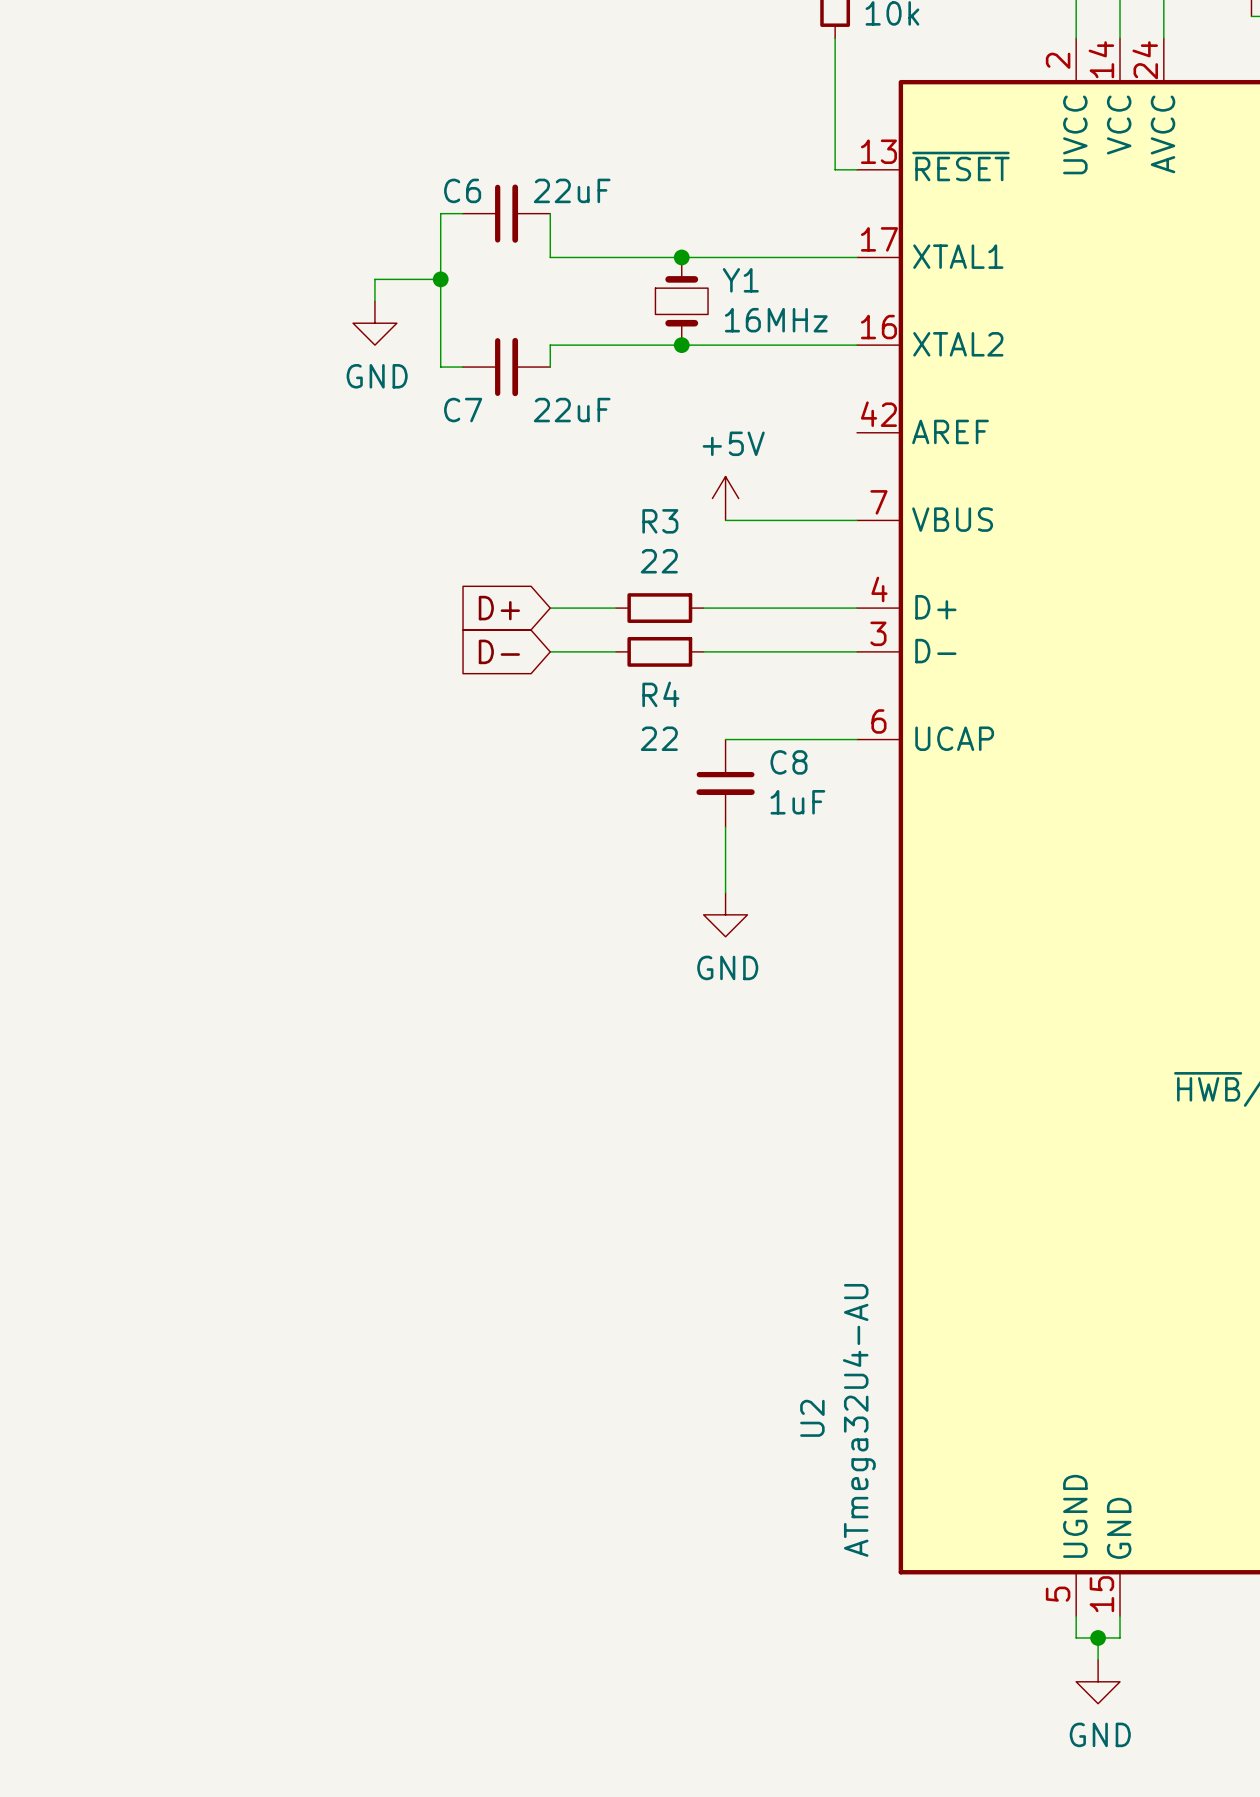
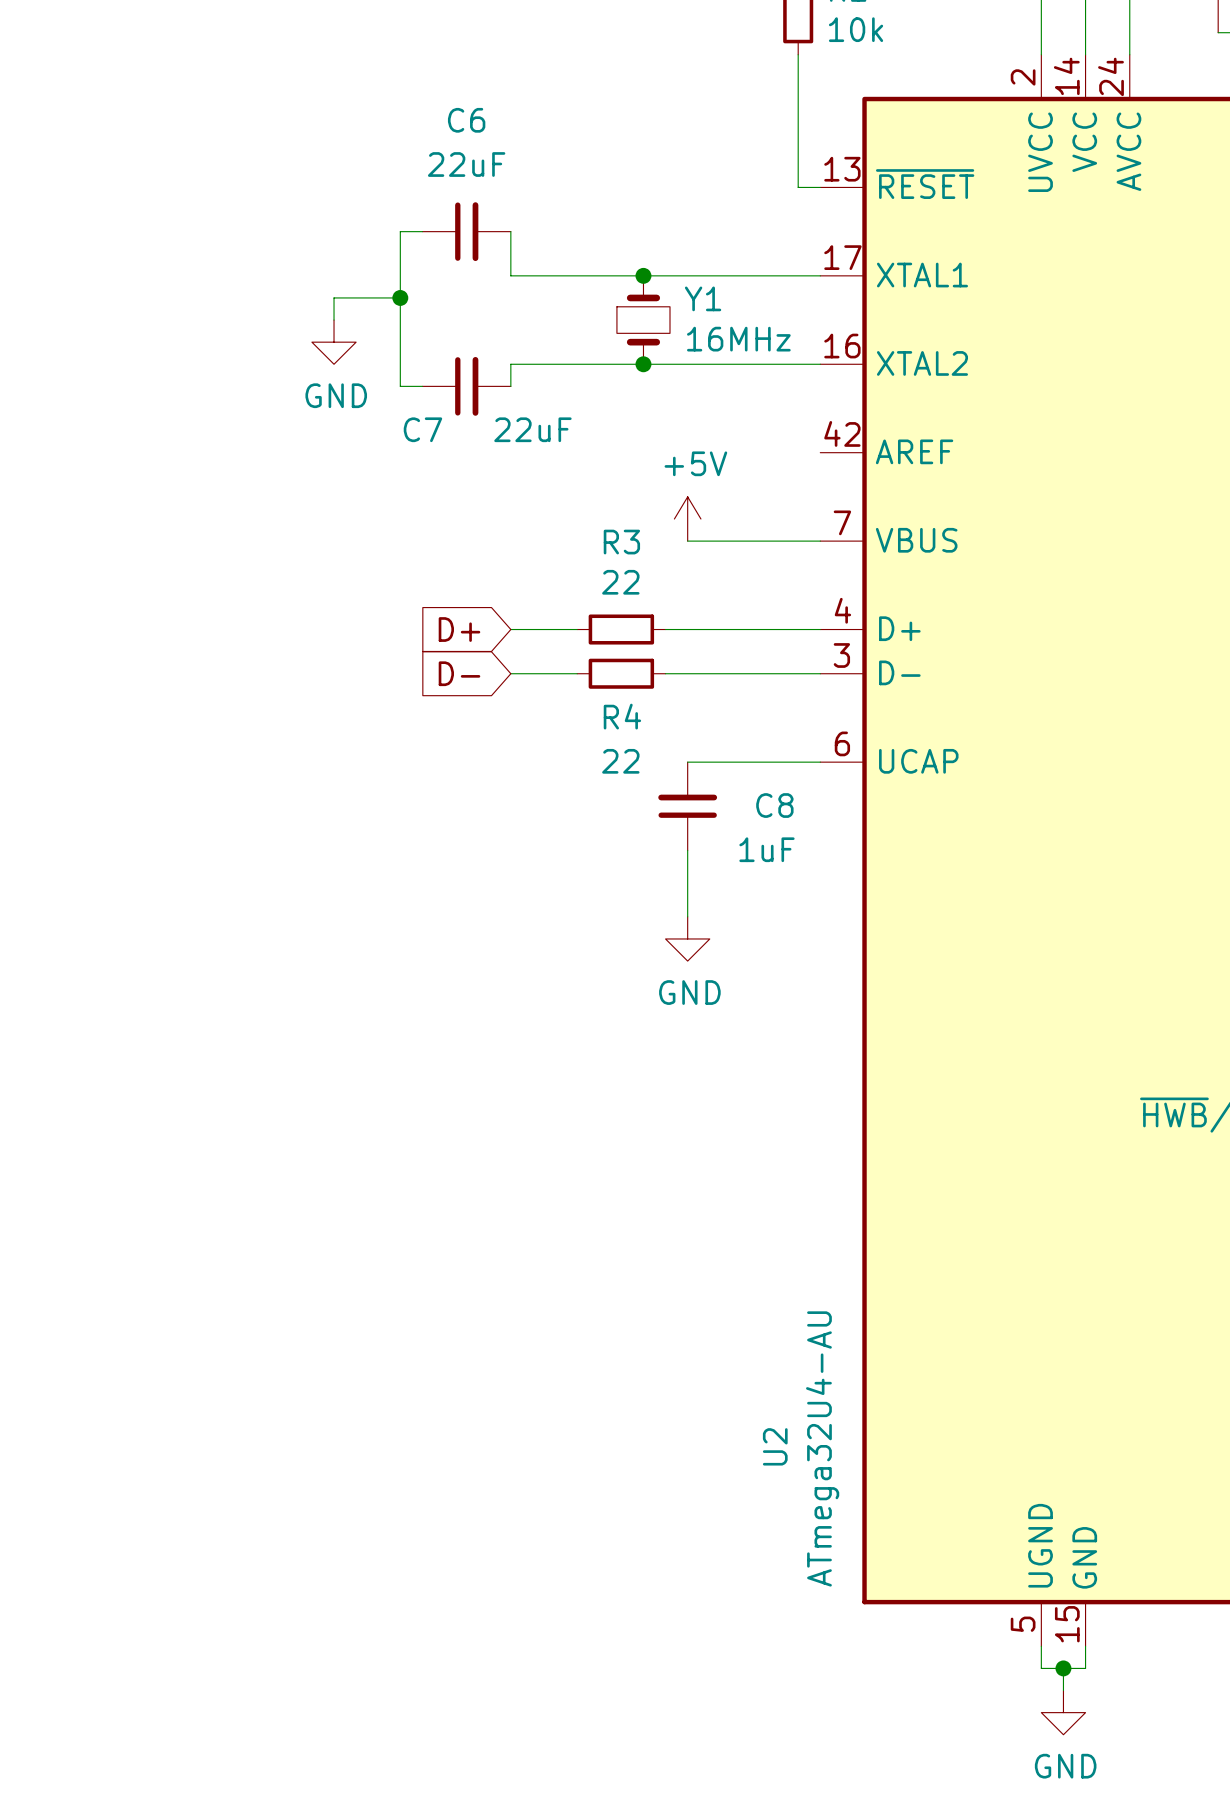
C6 name position: C6 (462, 190) -> C6 (466, 120)
C6 value position: 22uF (572, 190) -> 22uF (466, 164)
C8 rotation: 0° (725, 783) -> 180° (687, 806)

